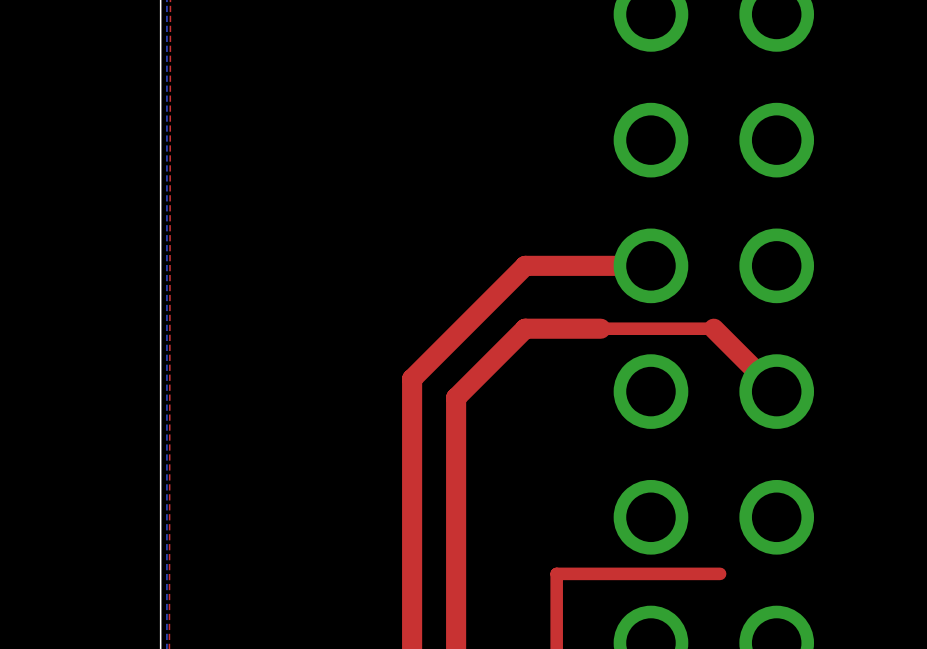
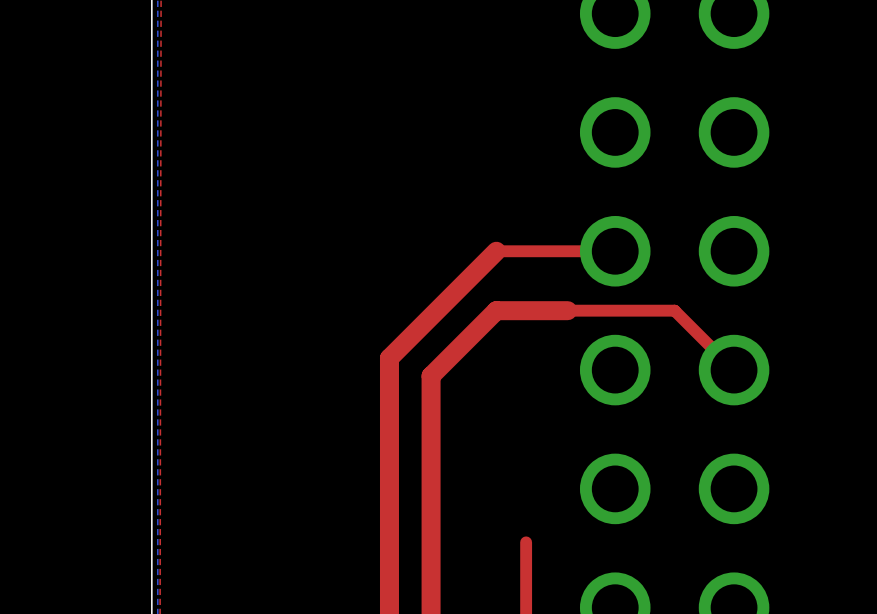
top track width: thick (525, 265) (650, 265) -> thin (496, 251) (615, 251)
top track width: thick (713, 328) (776, 391) -> thin (674, 310) (734, 370)
top track: (556, 573) (720, 573) -> none

